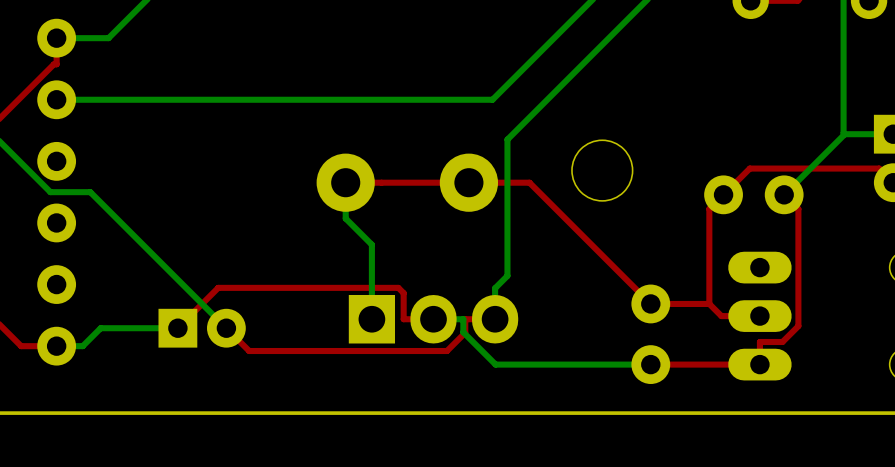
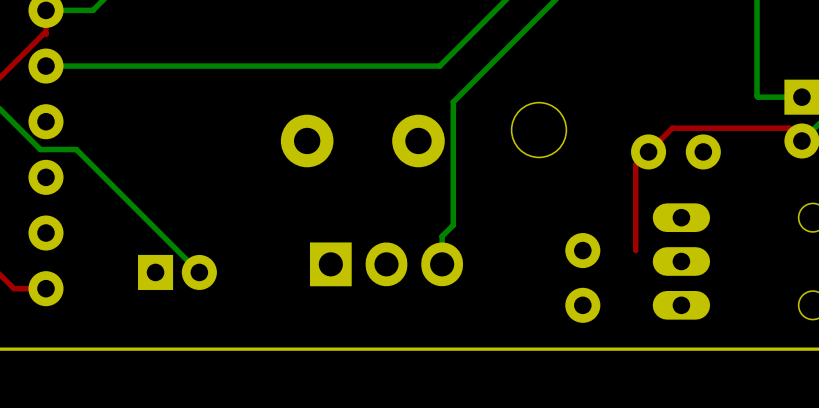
bottom track: (844, 134) (784, 194) -> none
bottom track: (345, 182) (345, 218) (371, 244) (371, 319) -> none
top track: (345, 182) (529, 182) (650, 303) (709, 303) (721, 316) (759, 316) -> none
top track: (784, 194) (798, 209) (798, 326) (782, 341) (759, 341) (759, 364) (650, 364) -> none
bottom track: (433, 319) (463, 319) (463, 332) (495, 364) (650, 364) -> none
top track: (433, 319) (403, 319) (403, 293) (398, 287) (218, 287) (177, 328) -> none
top track: (495, 319) (465, 319) (465, 332) (447, 351) (249, 351) (226, 328) -> none
bottom track: (177, 328) (100, 328) (82, 346) (56, 346) -> none

